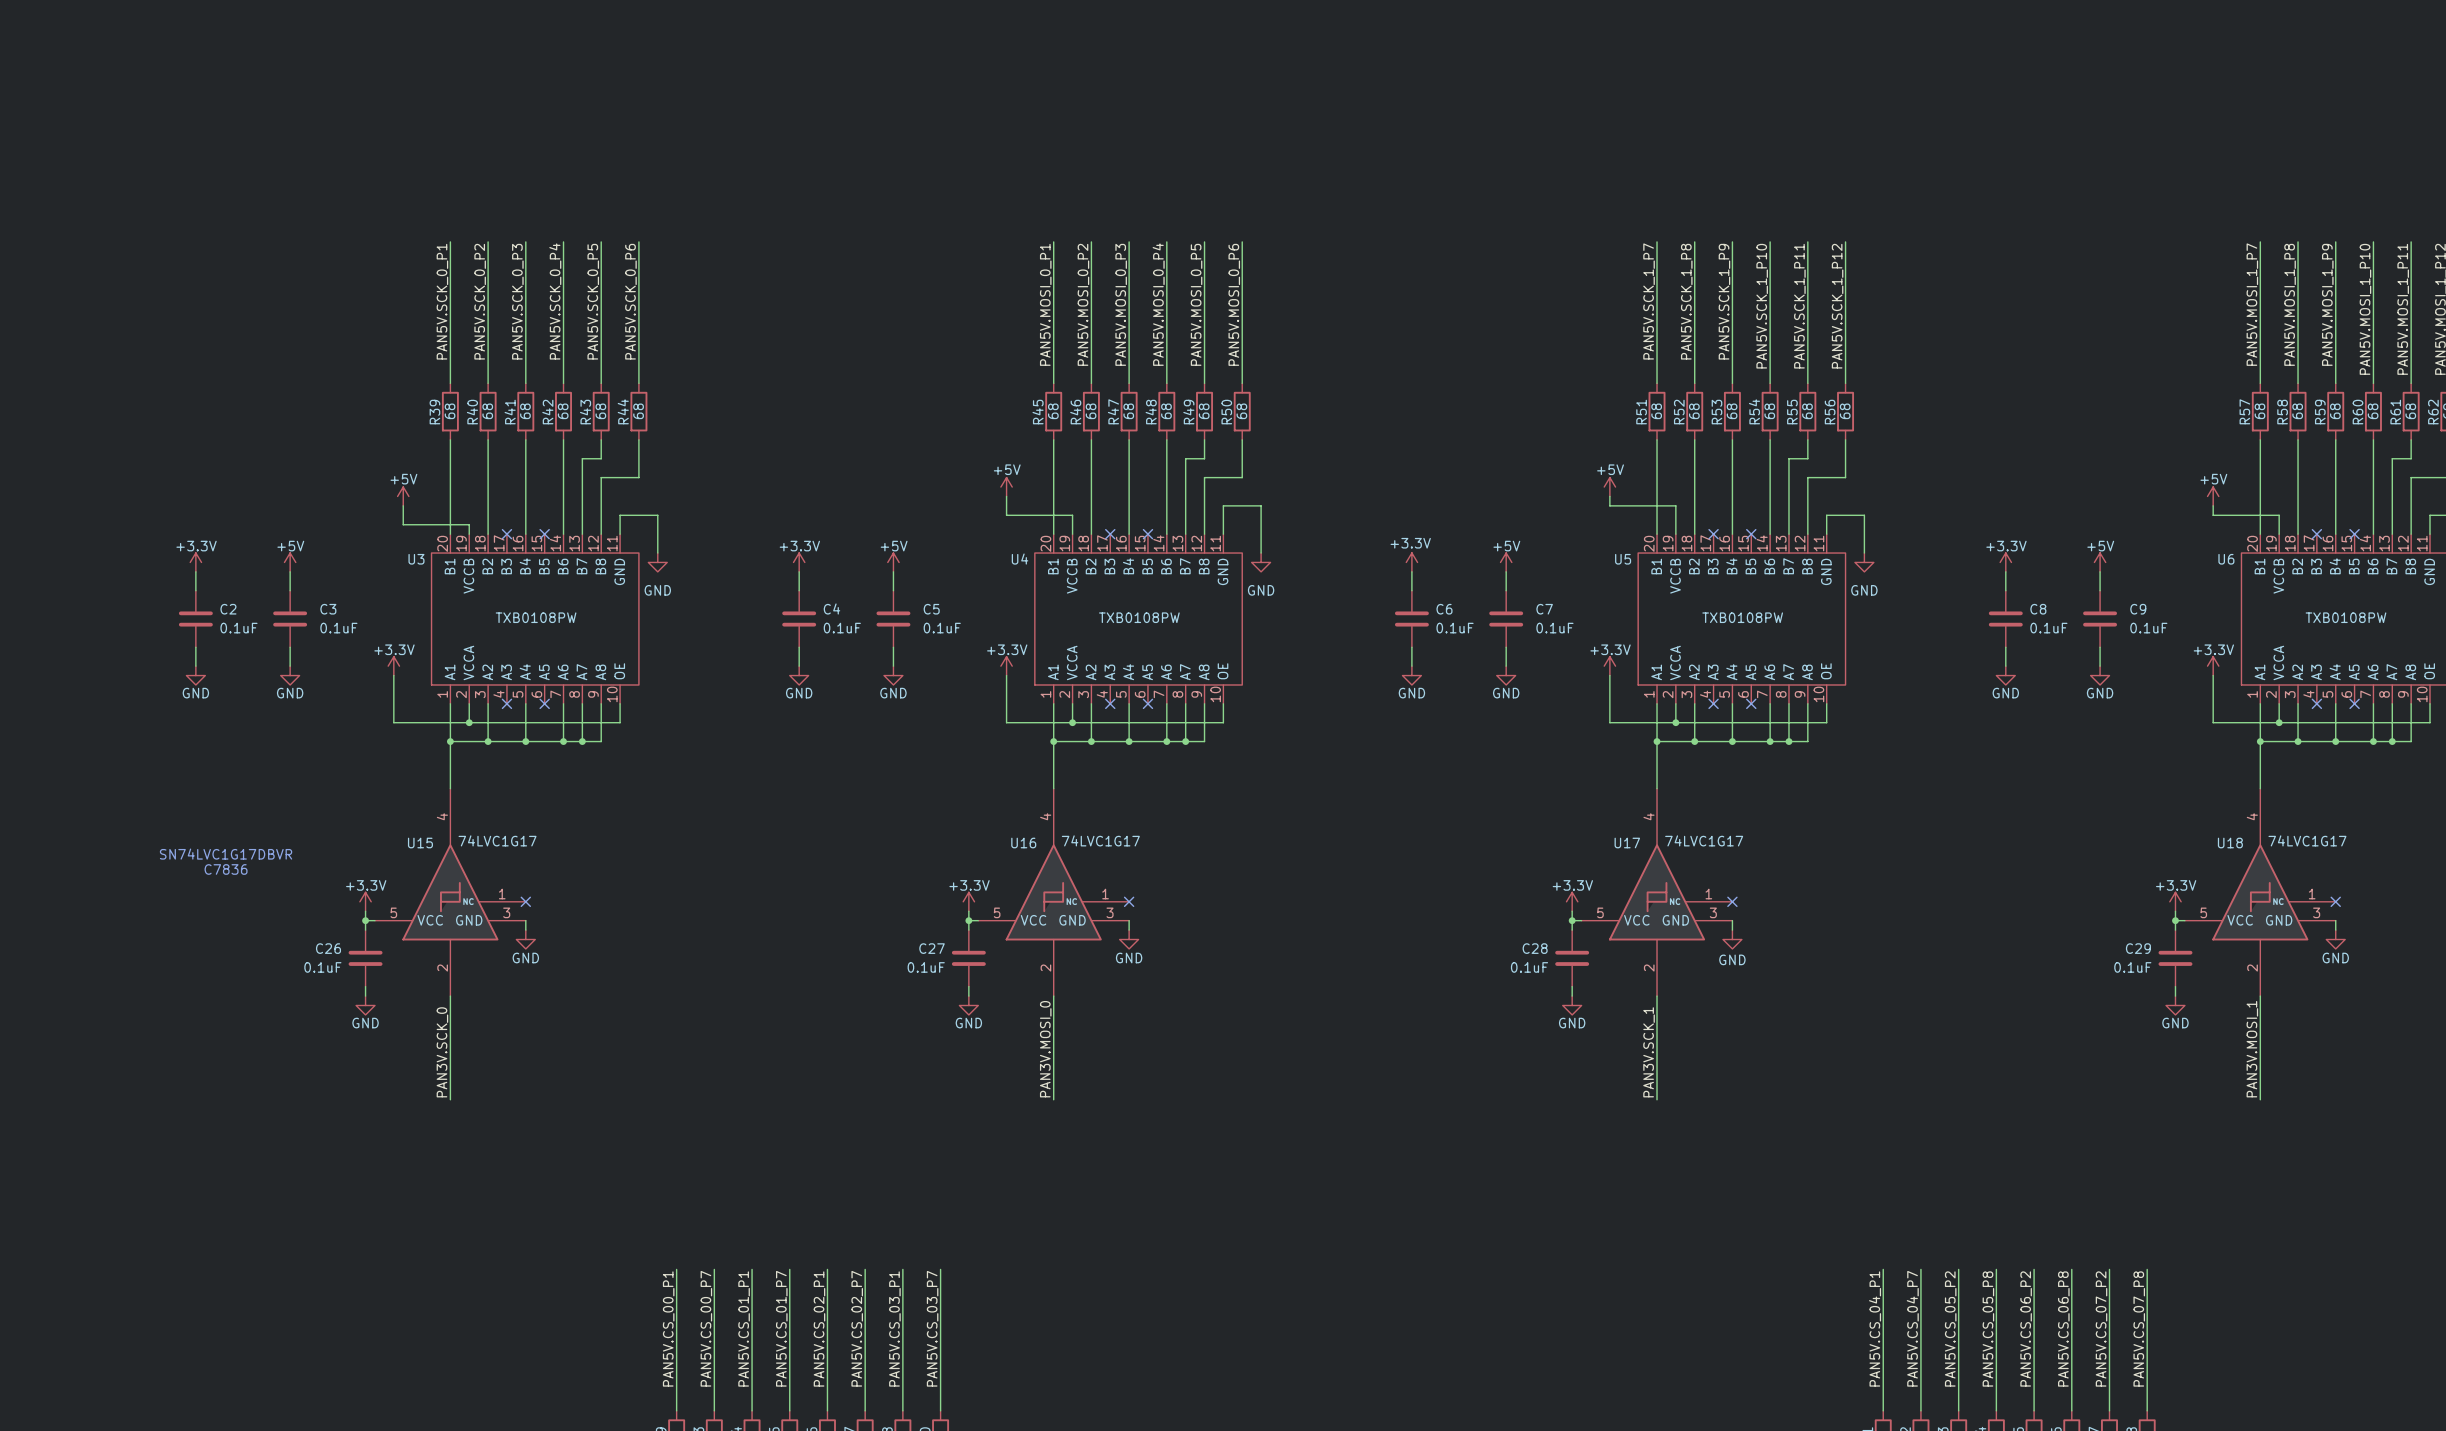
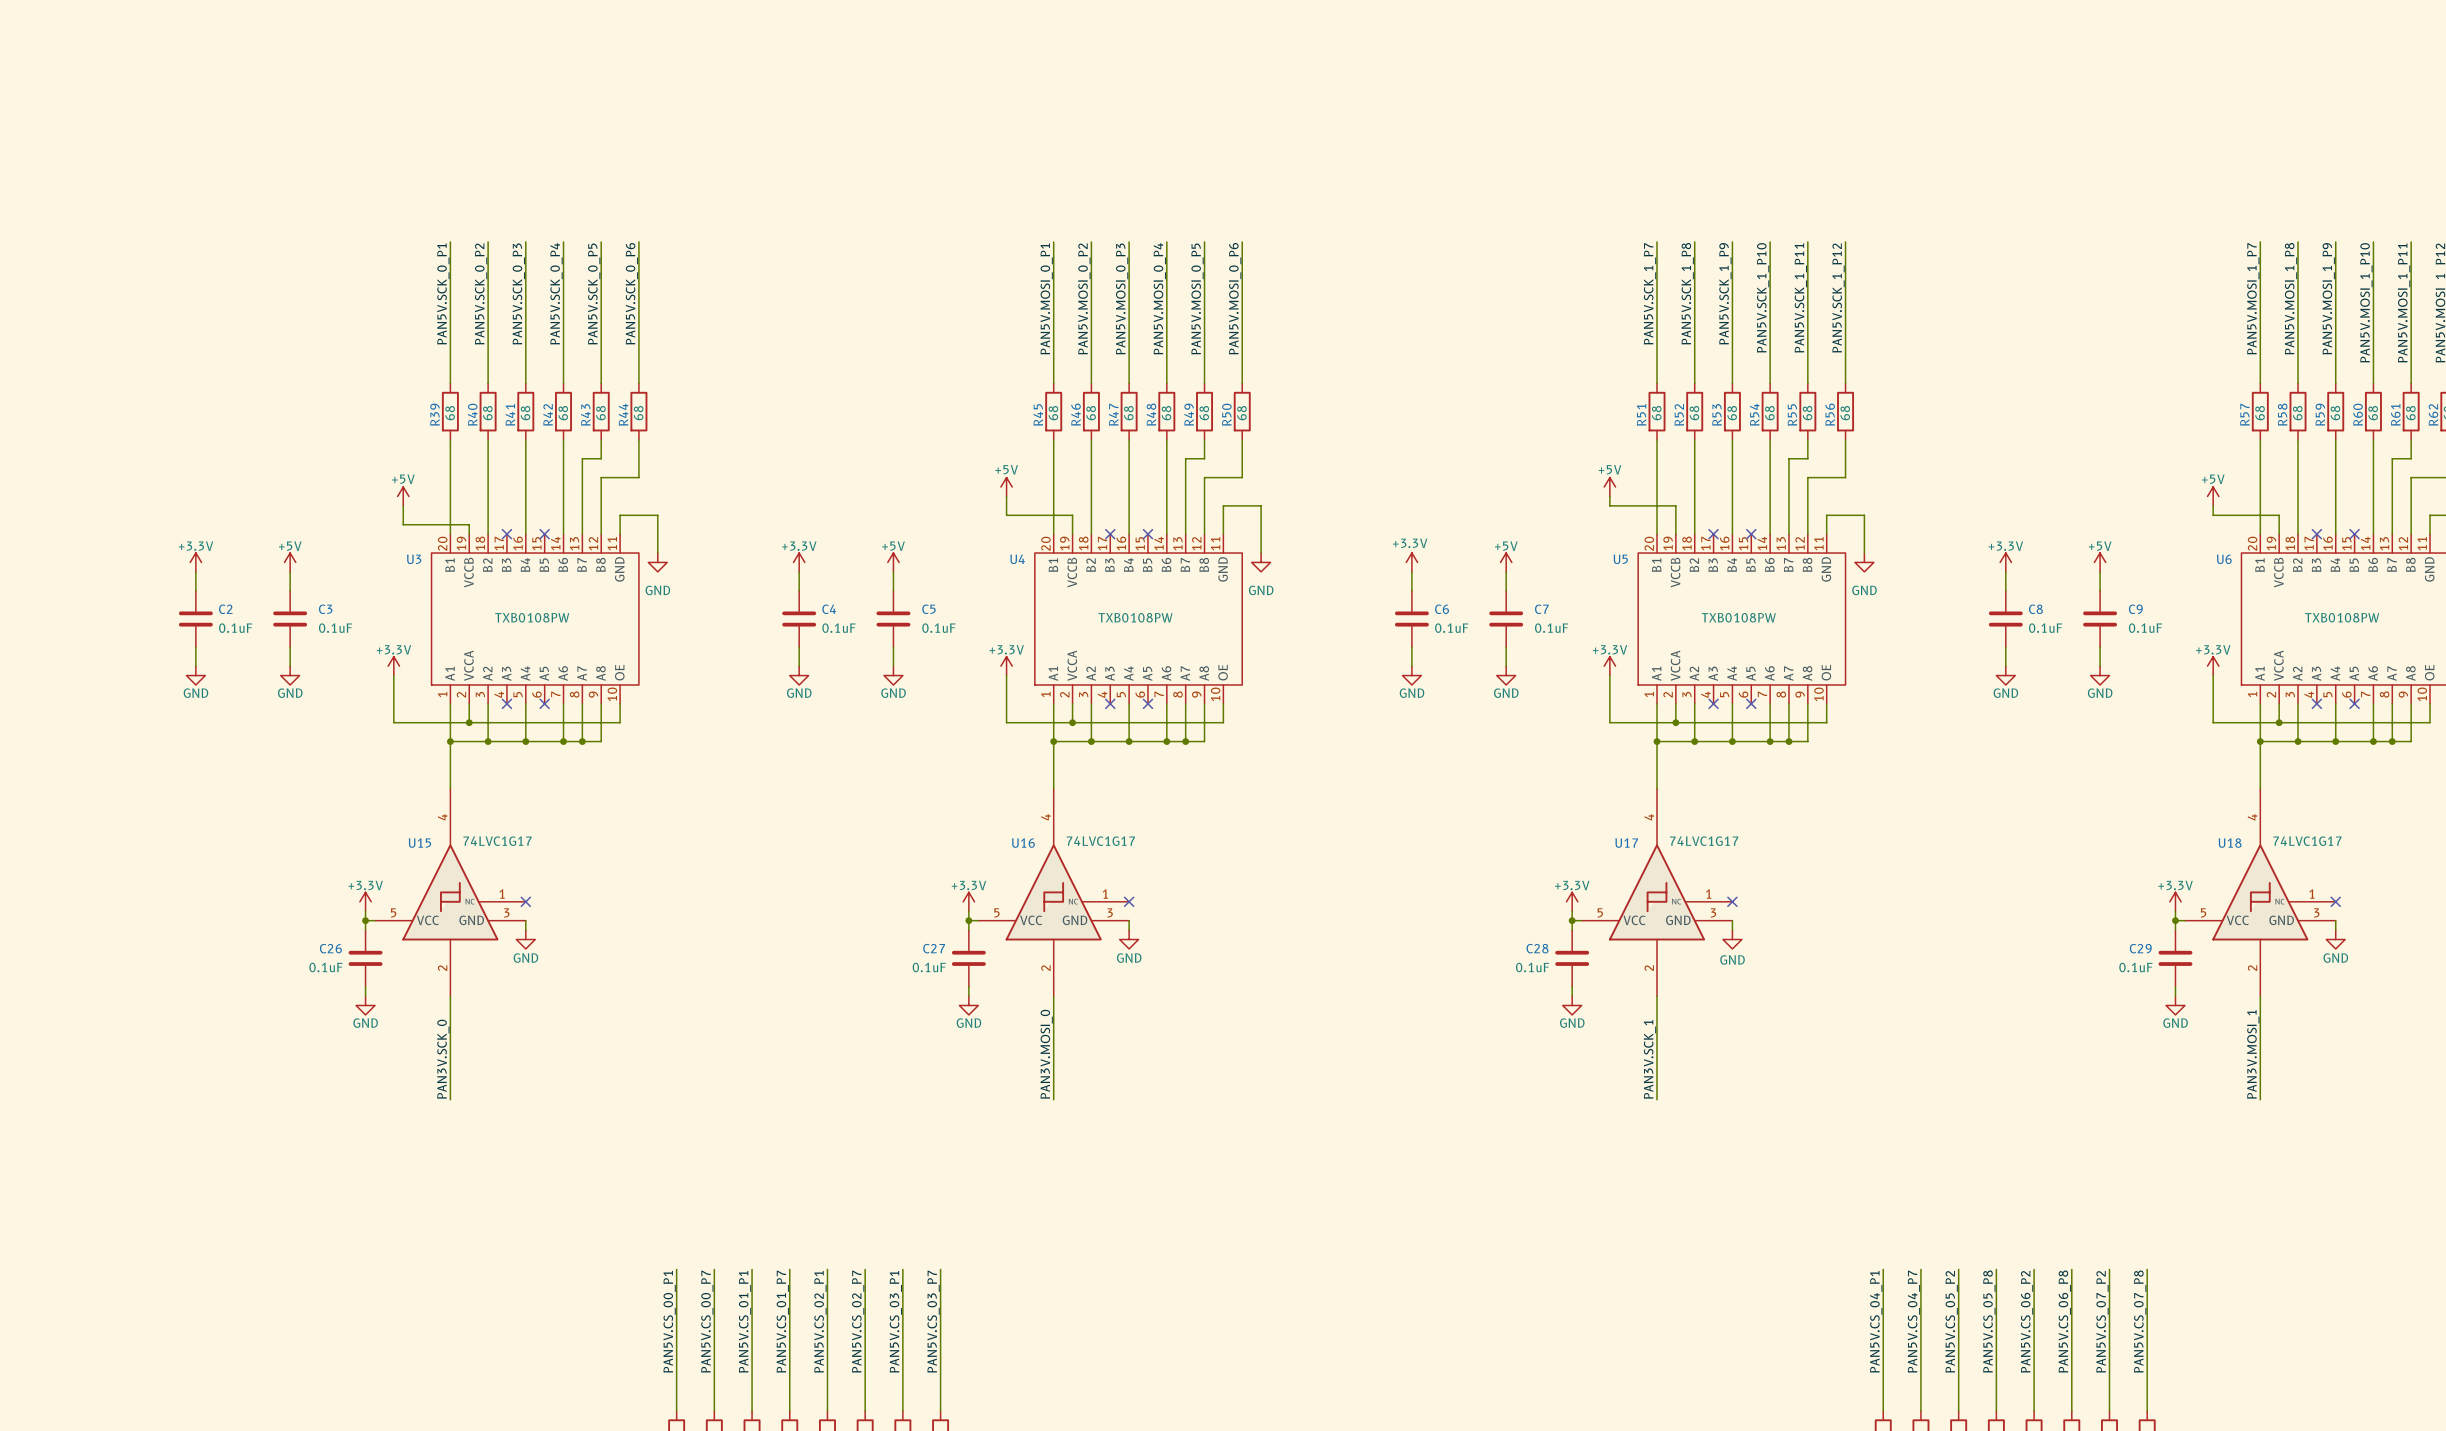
text: SN74LVC1G17DBVR (226, 854) -> none
text: C7836 (226, 869) -> none

